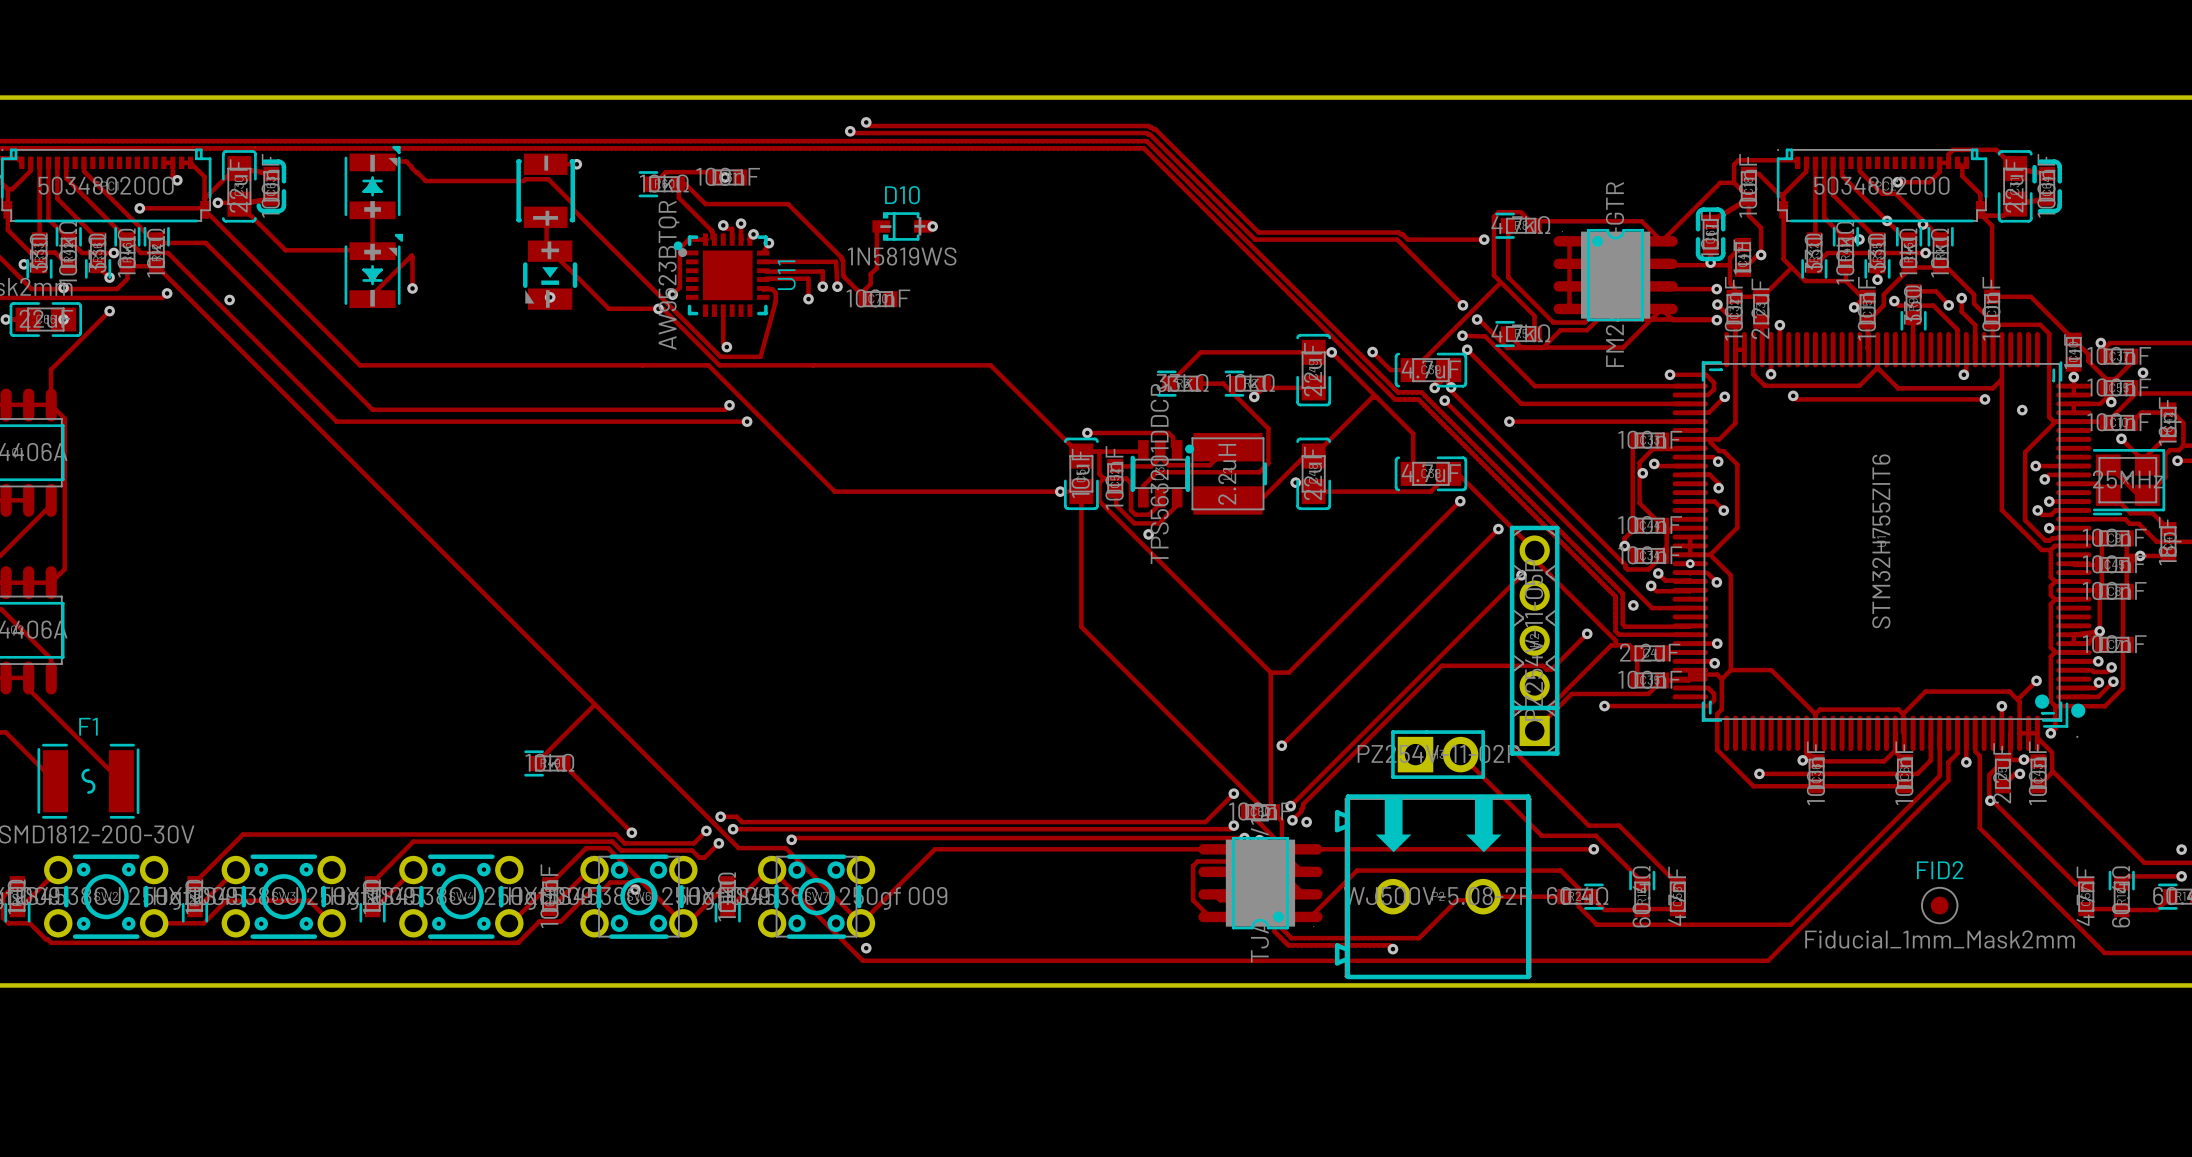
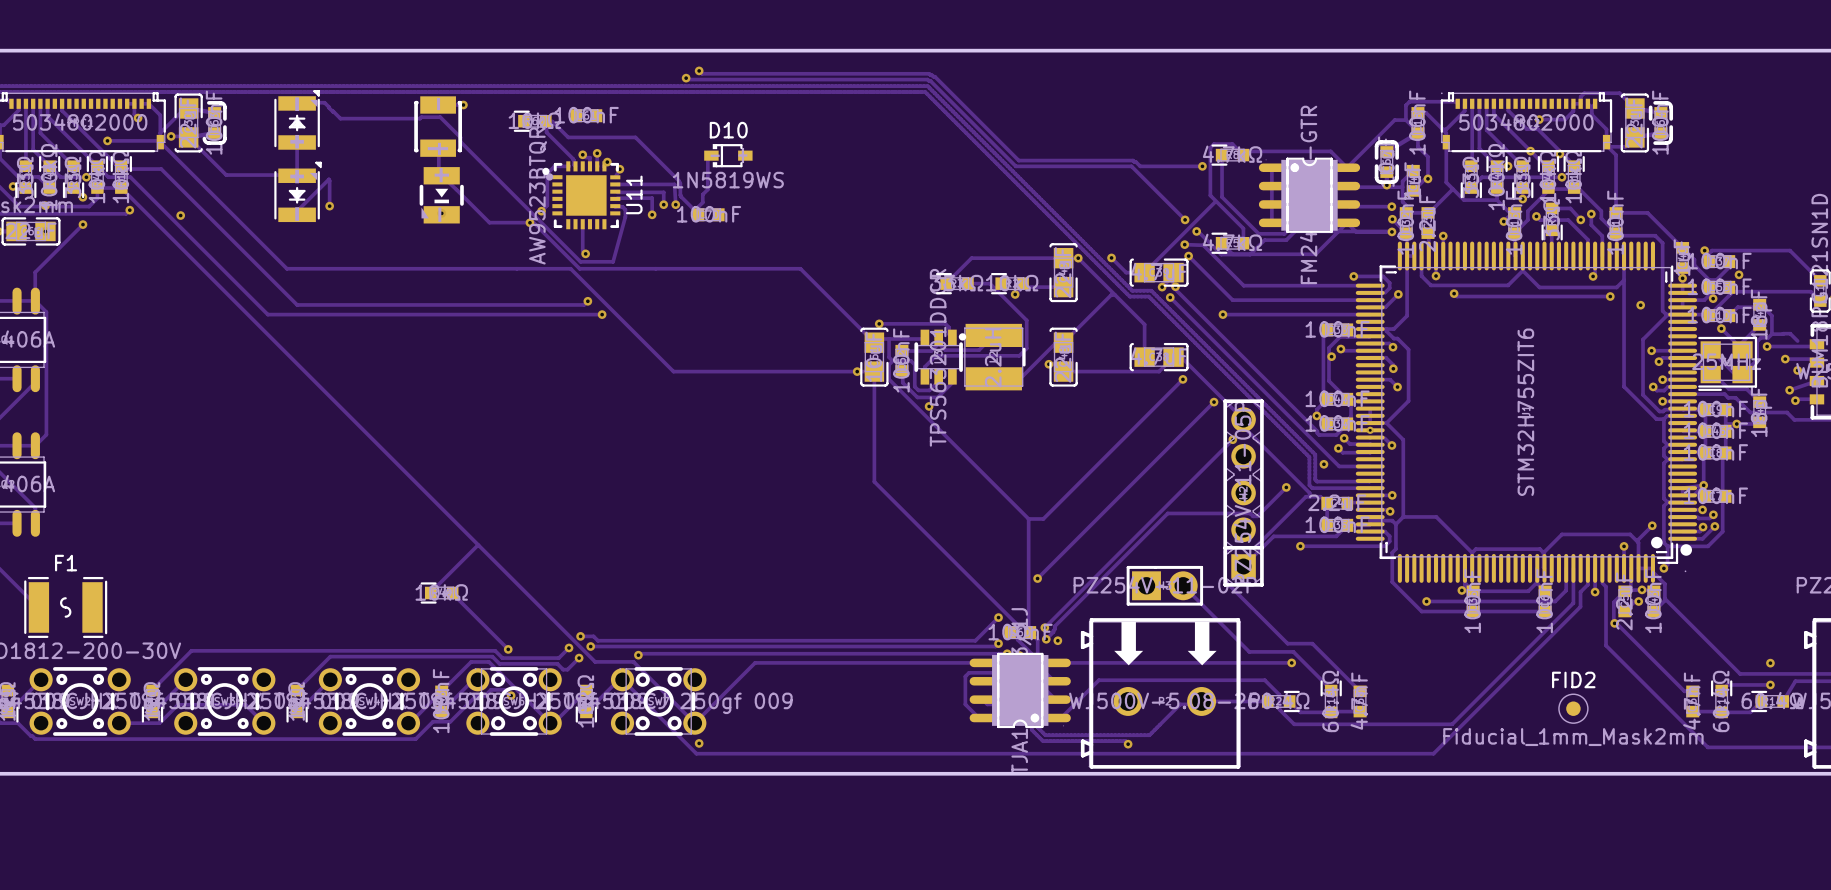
track: (725, 177) (715, 177) (709, 172) (665, 172) (651, 184) -> none
via: (725, 177) -> none
via: (932, 226) -> none
track: (28, 677) (29, 689) (121, 781) -> none

